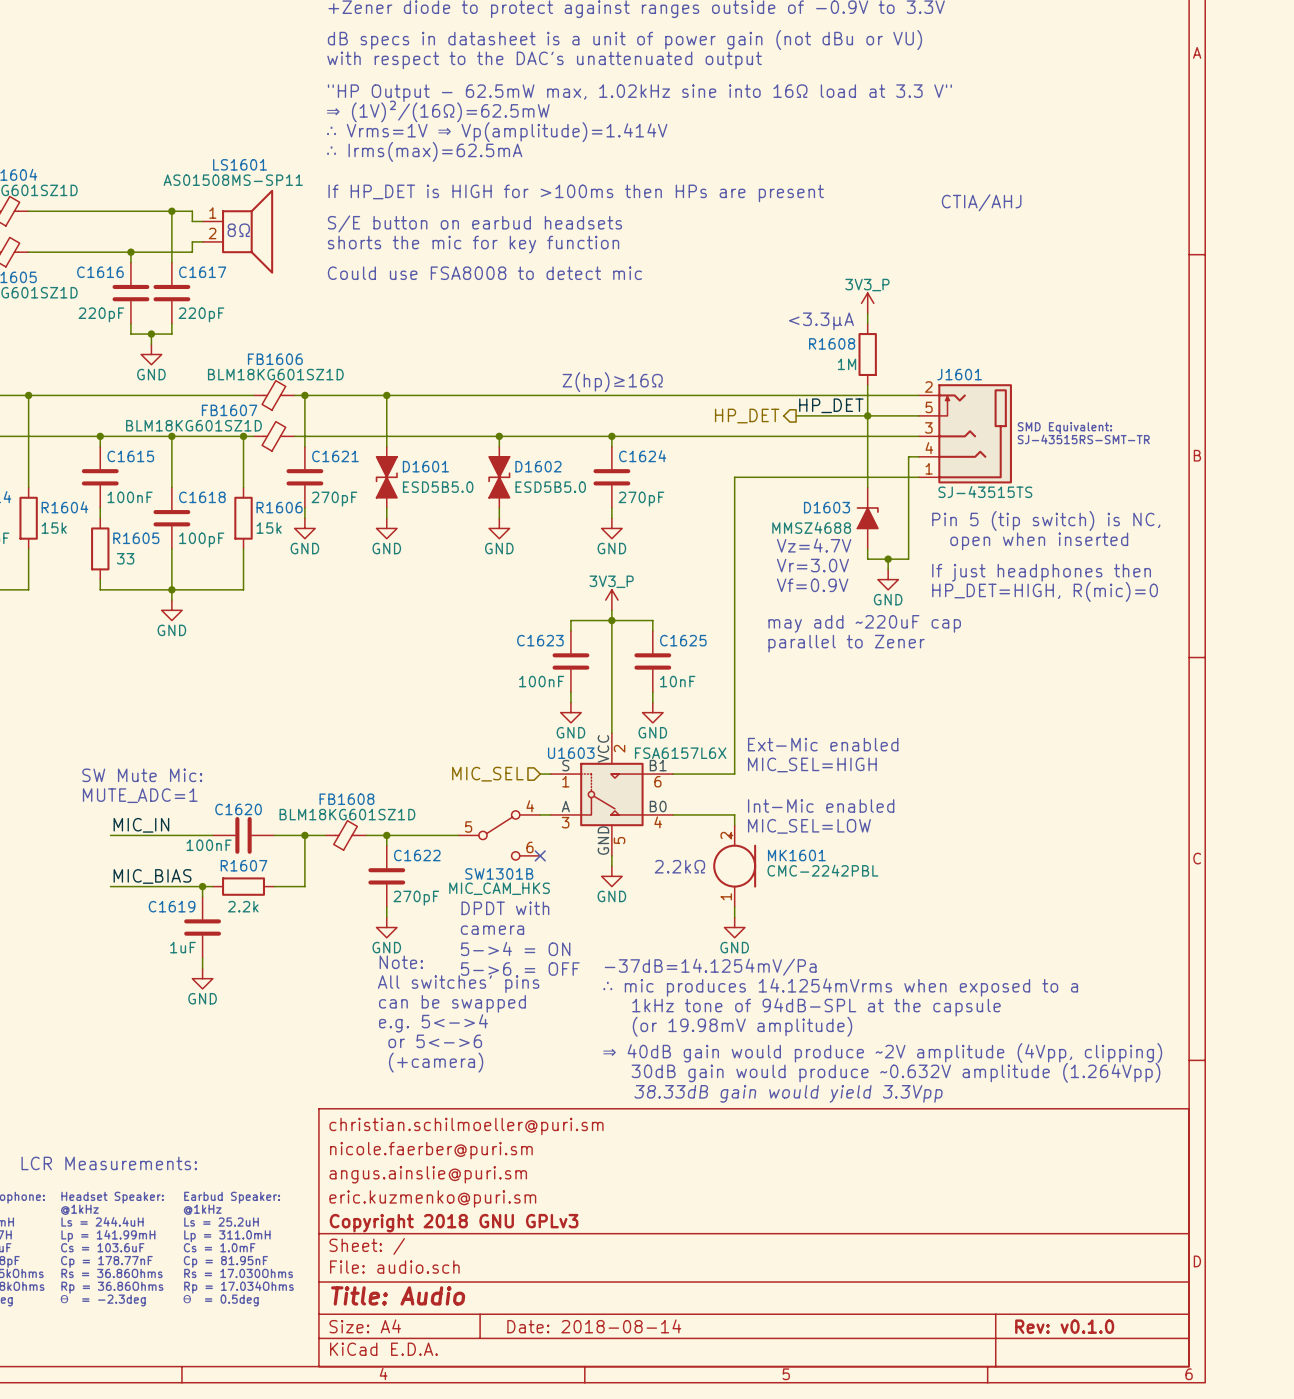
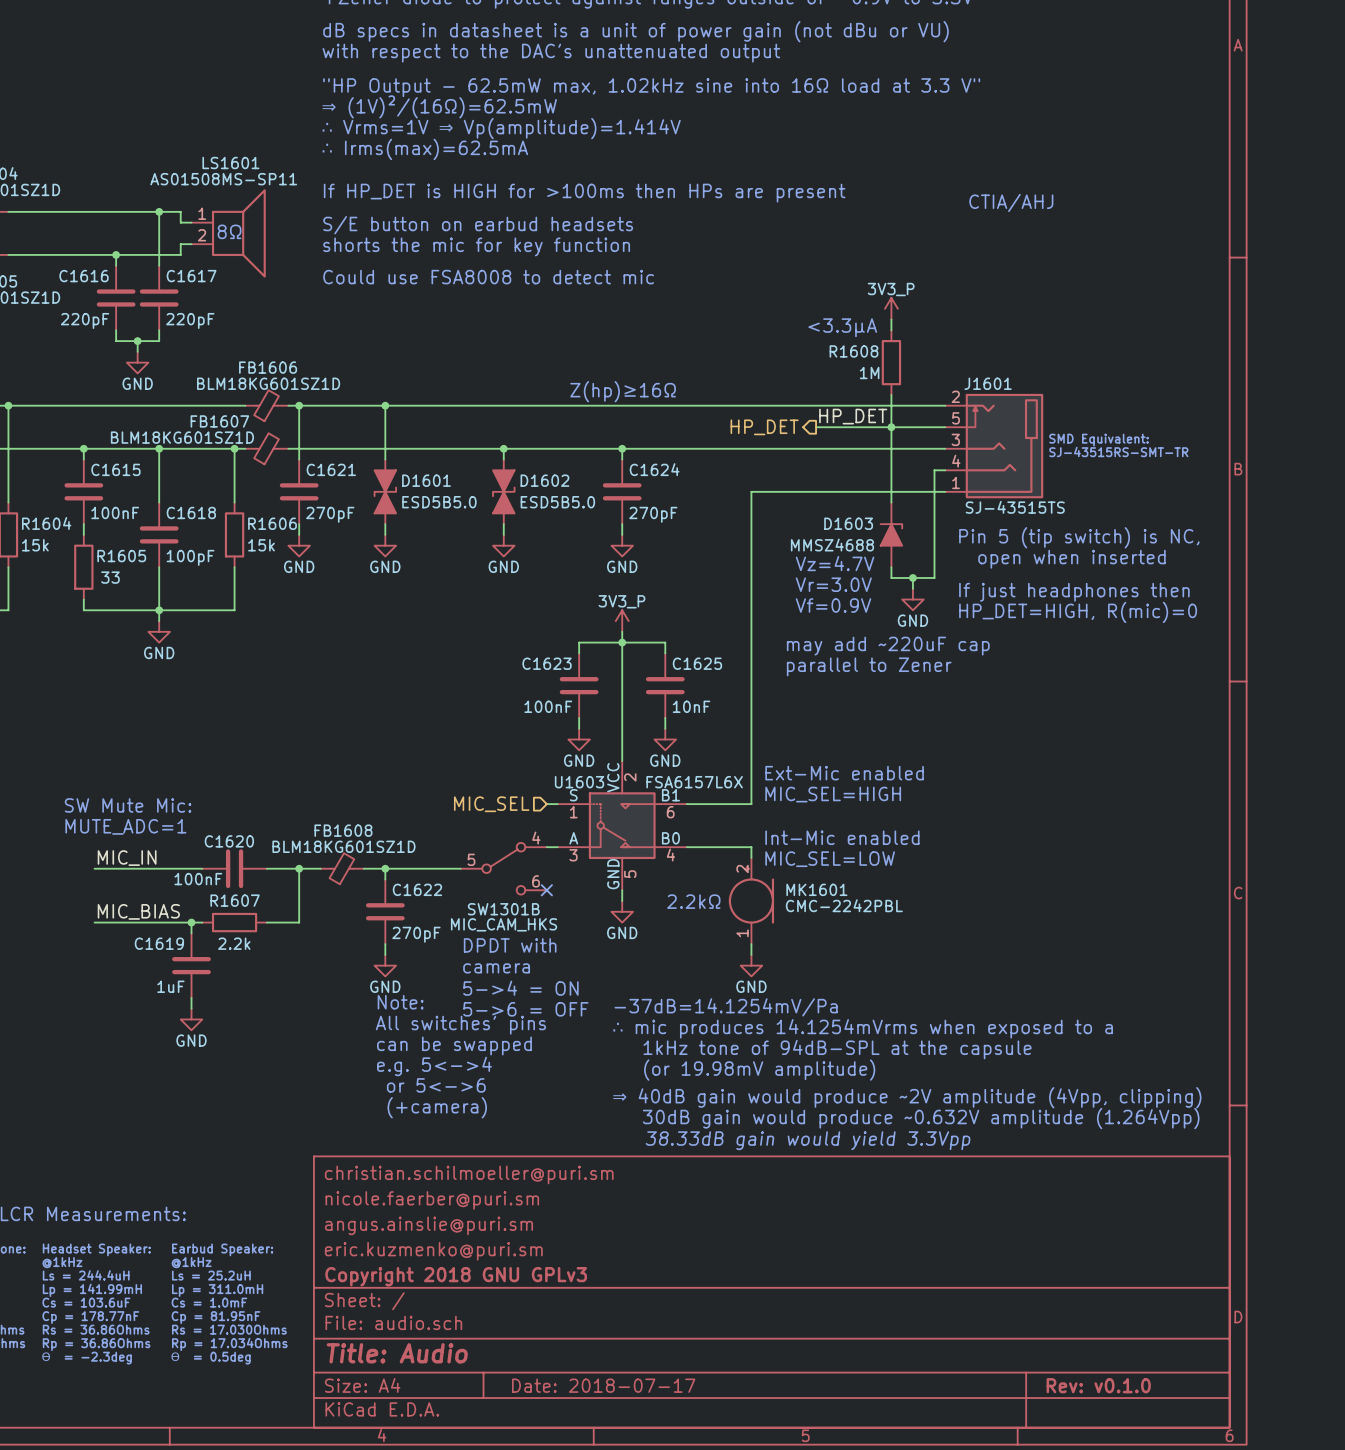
title block: Date: 2018-08-14 (594, 1326) -> Date: 2018-07-17 (603, 1385)

